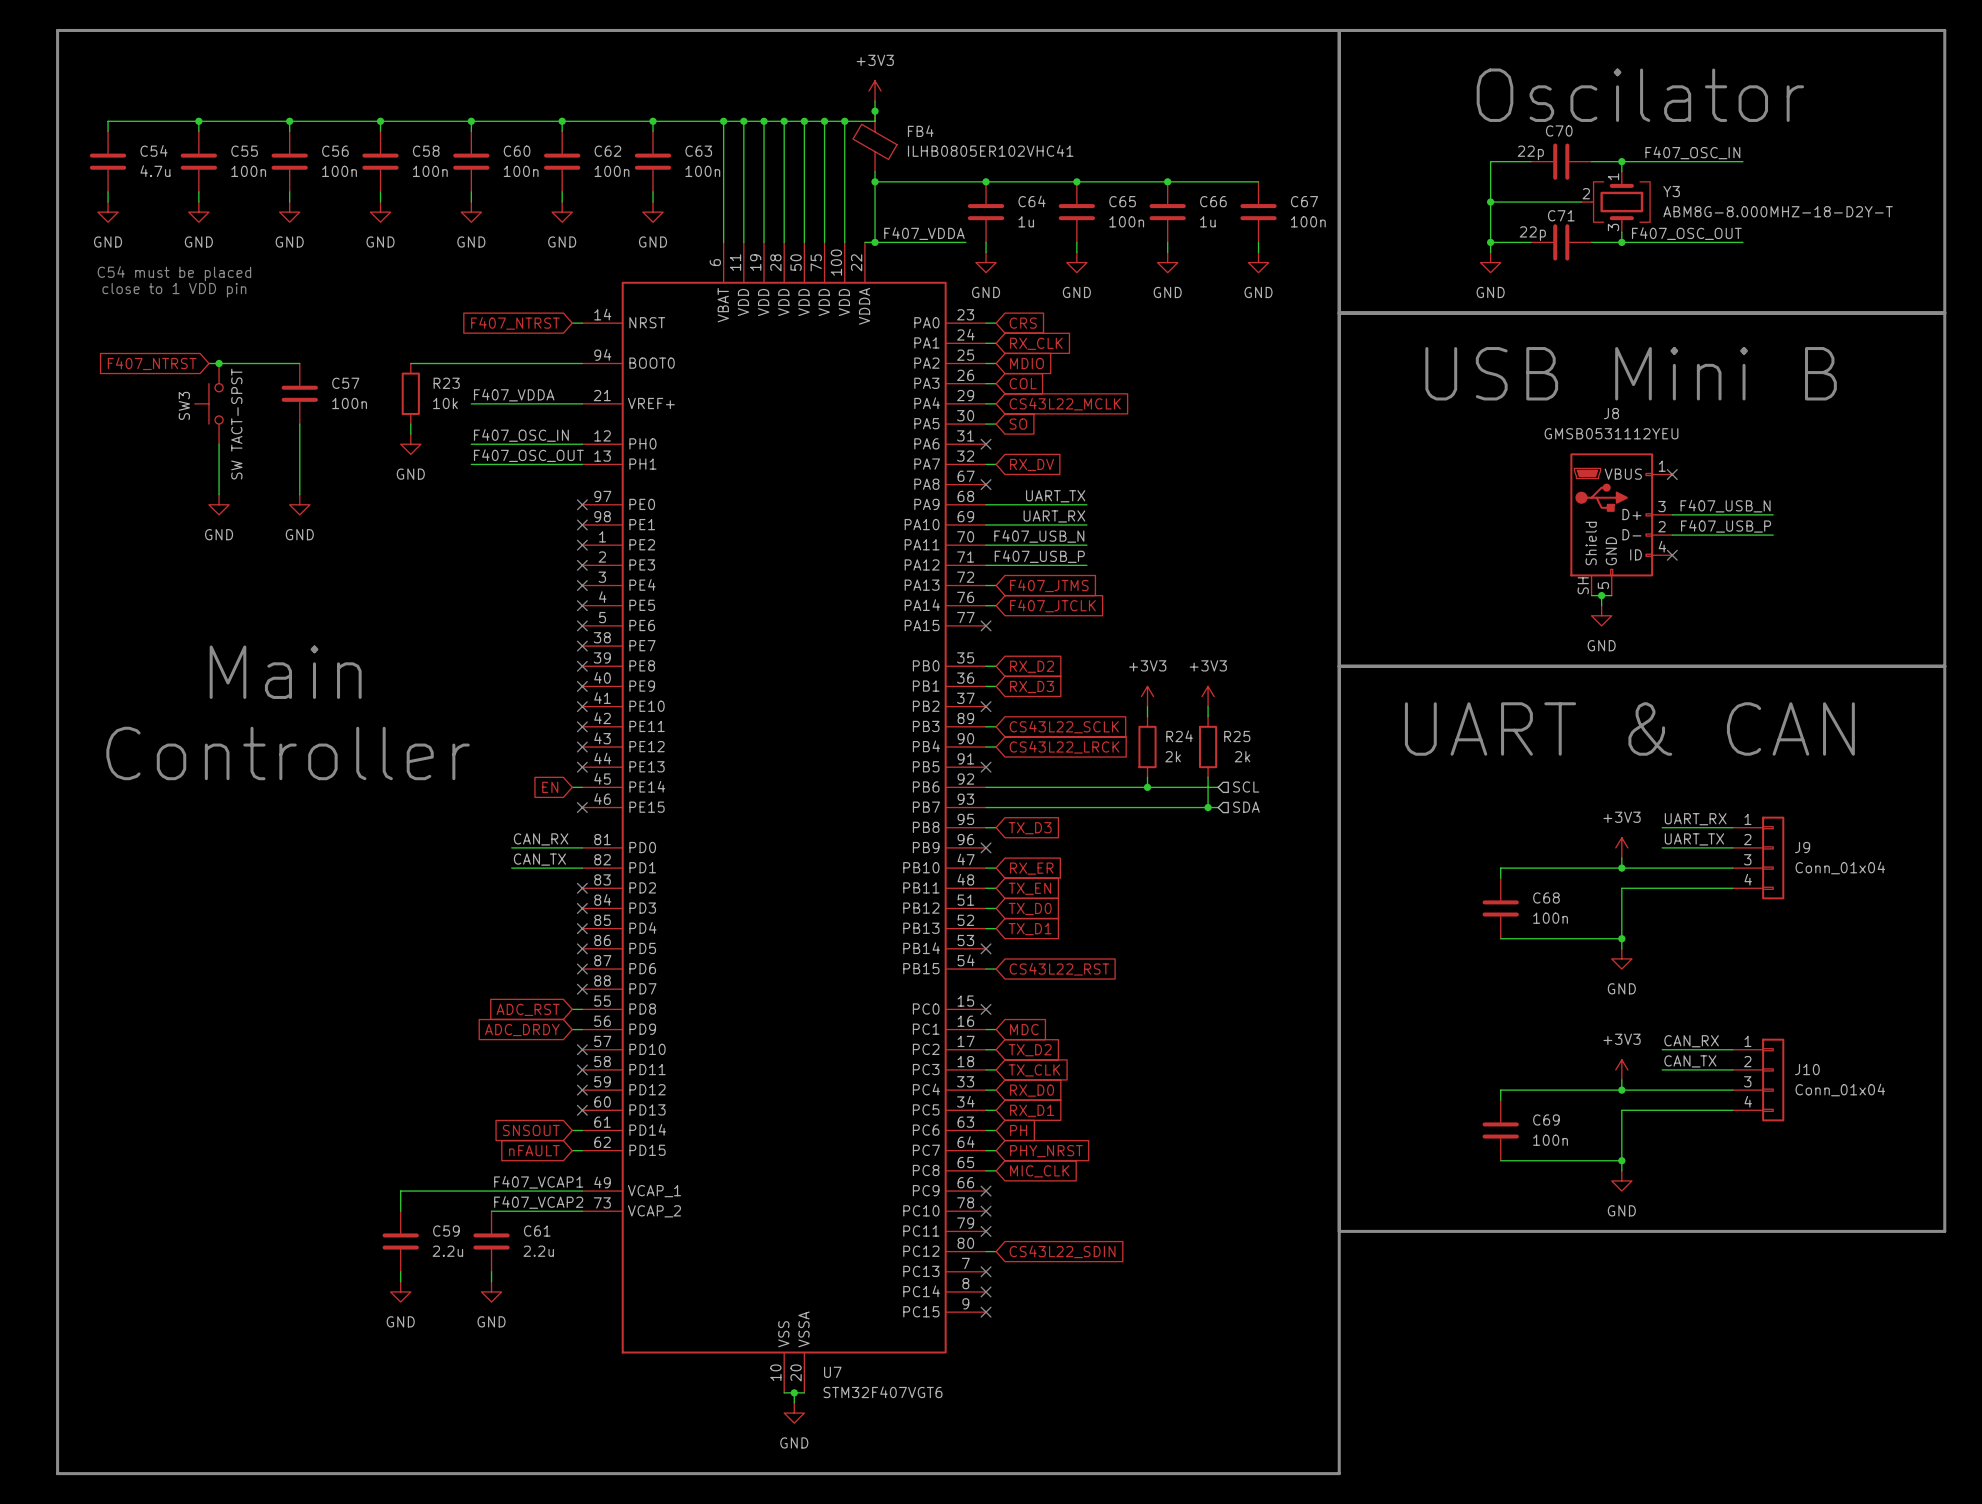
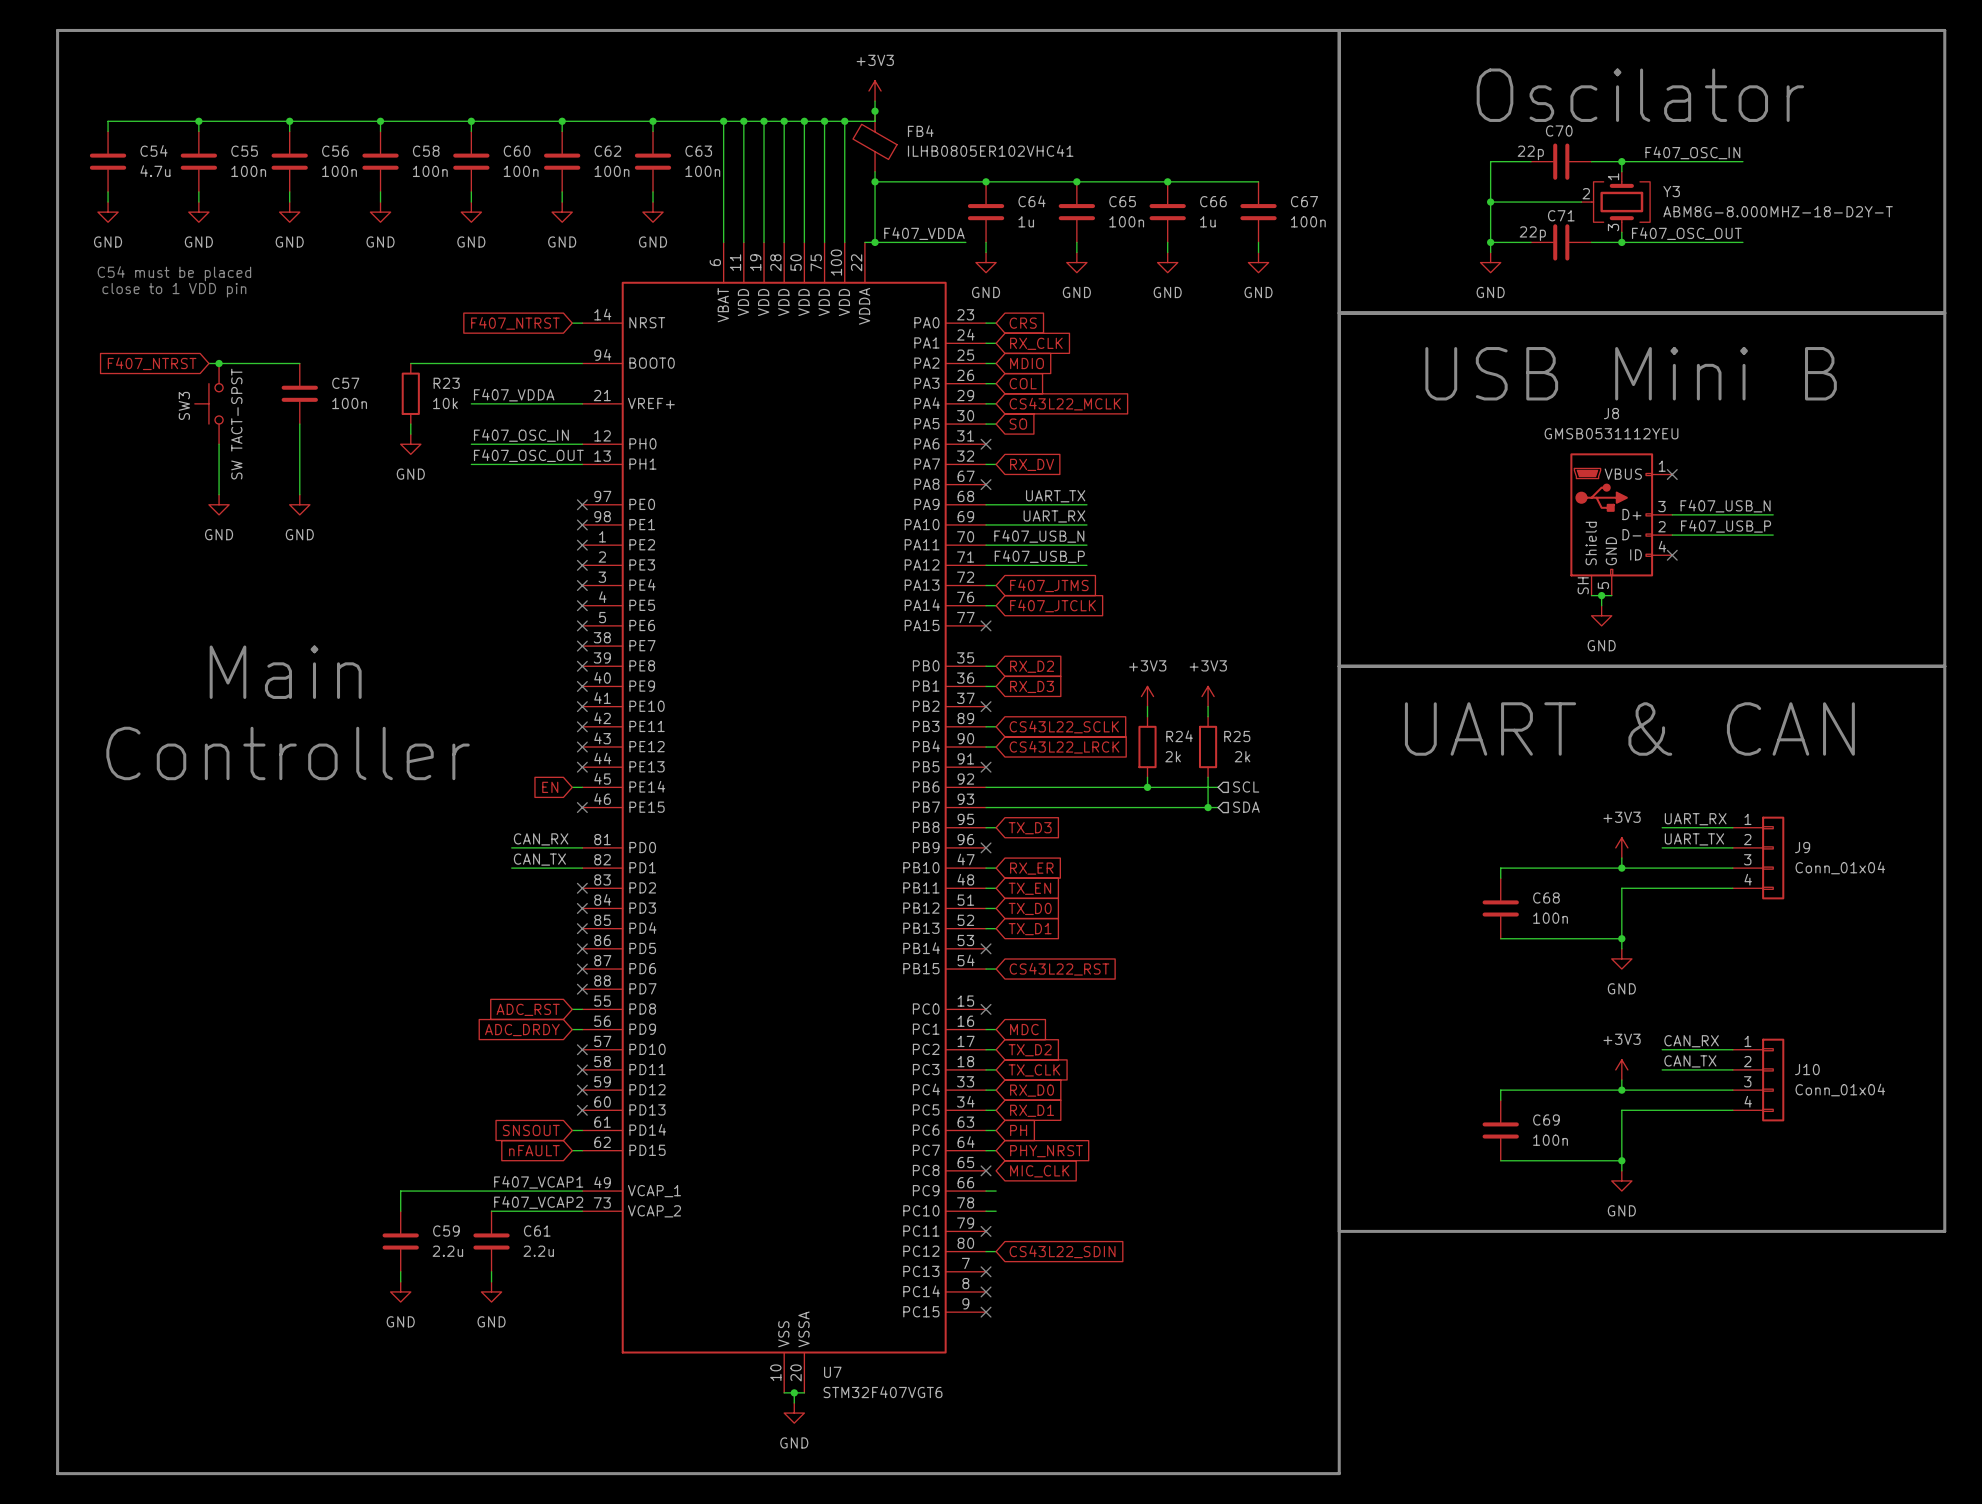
wire: (986, 1170) (996, 1170) -> (986, 1191) (996, 1191)
no-connect mark: none -> (986, 1170)
no-connect mark: (986, 1191) -> none
wire: none -> (986, 1211) (996, 1211)
no-connect mark: (986, 1211) -> none

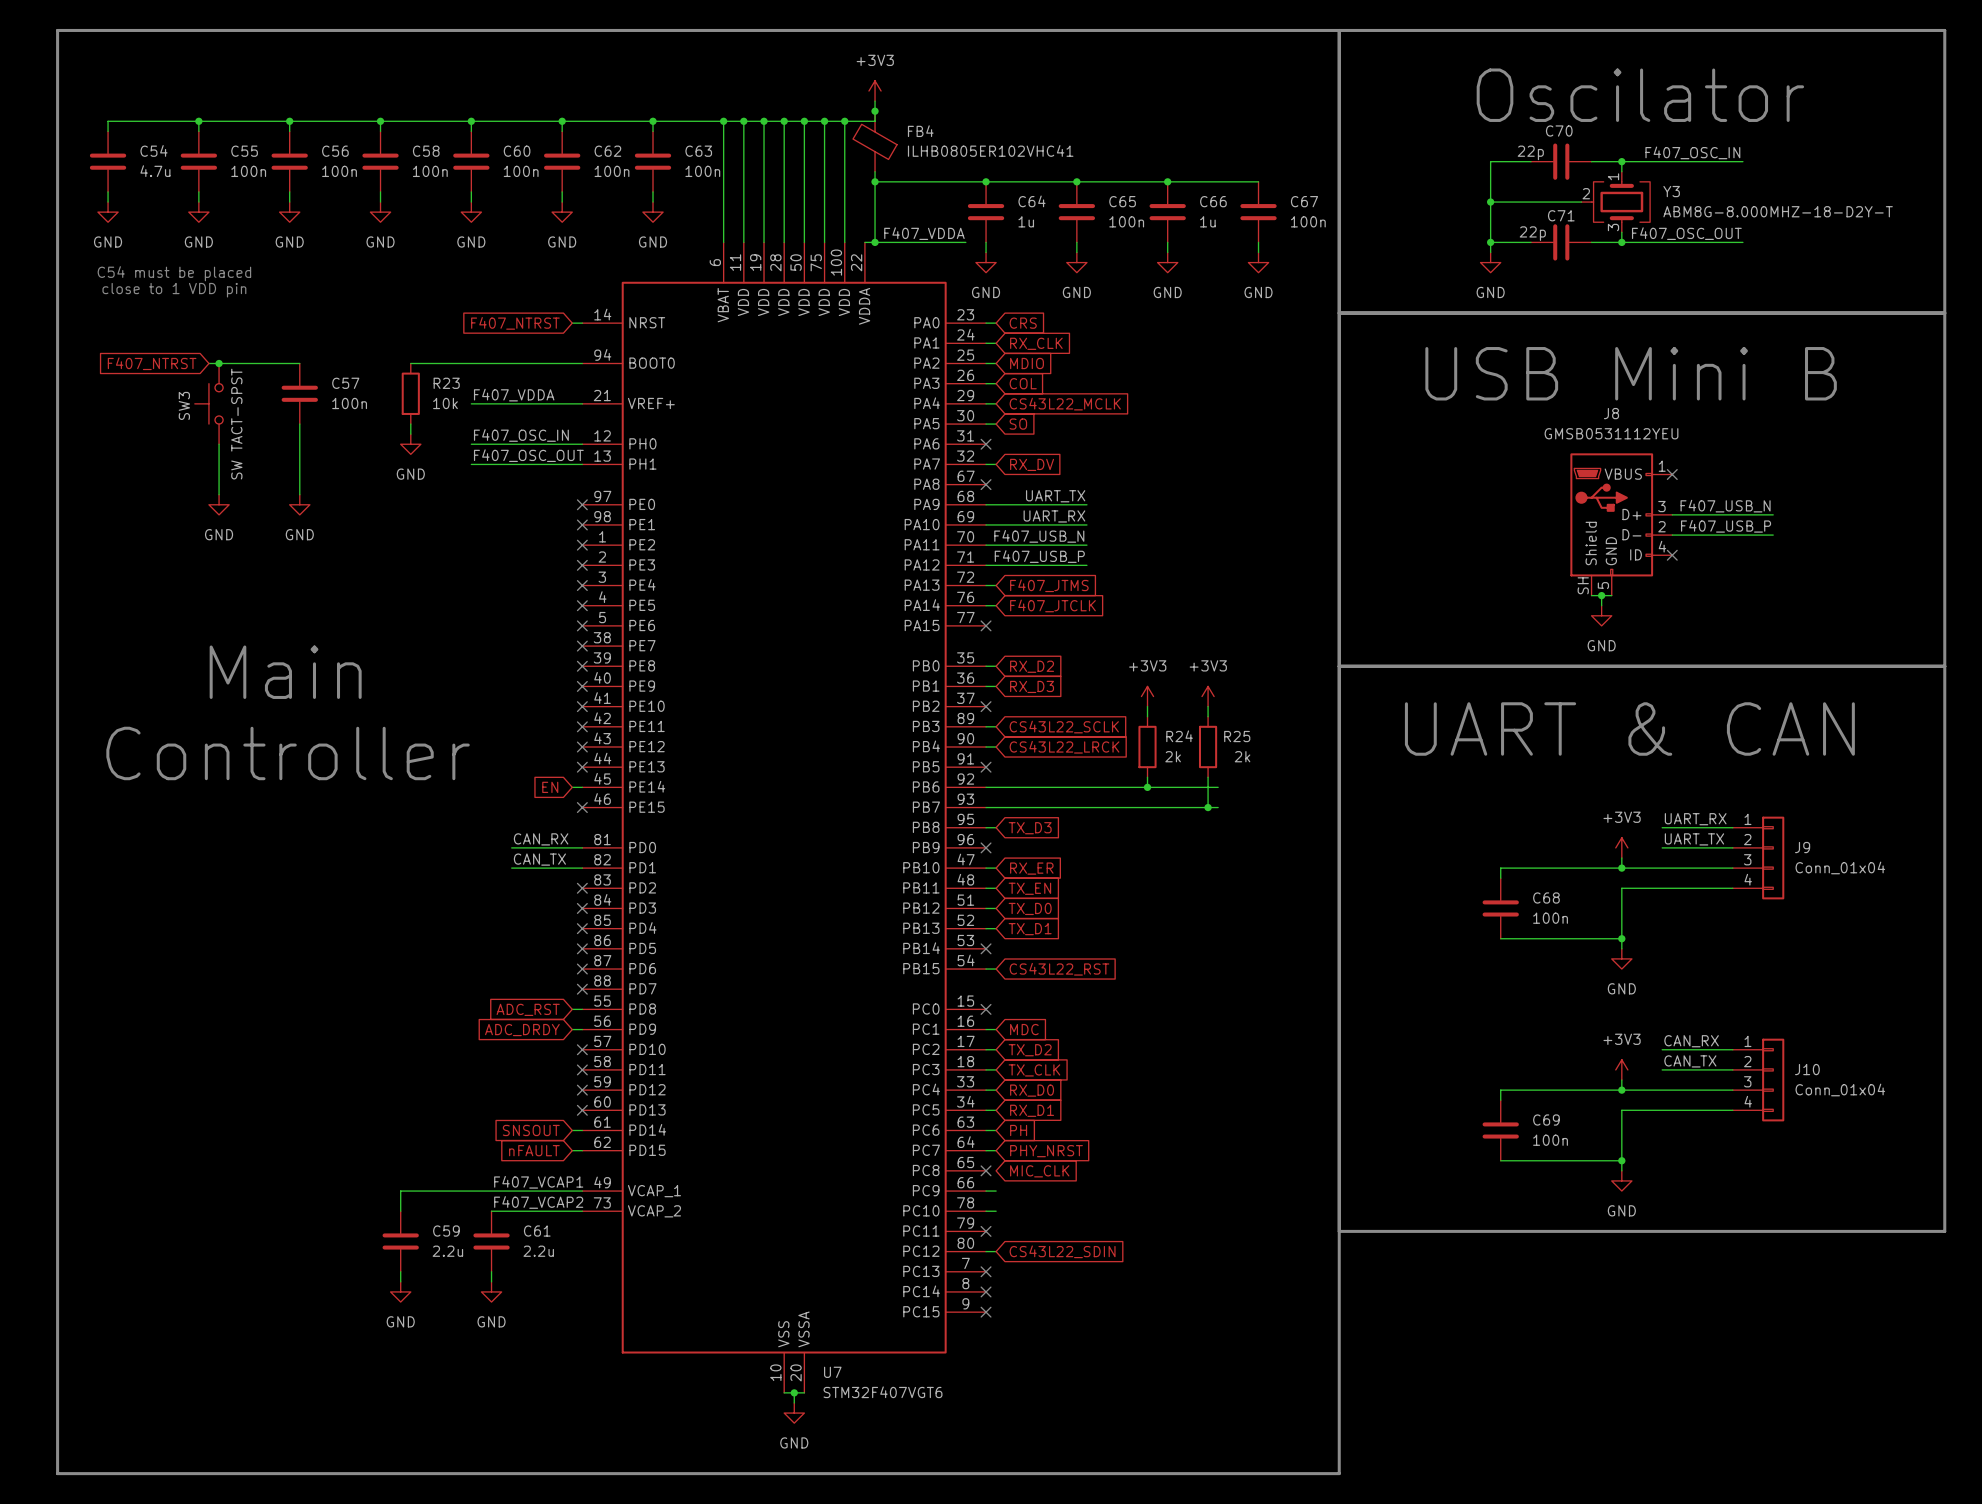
hierarchical label: SCL (1246, 786) -> none
hierarchical label: SDA (1246, 807) -> none

